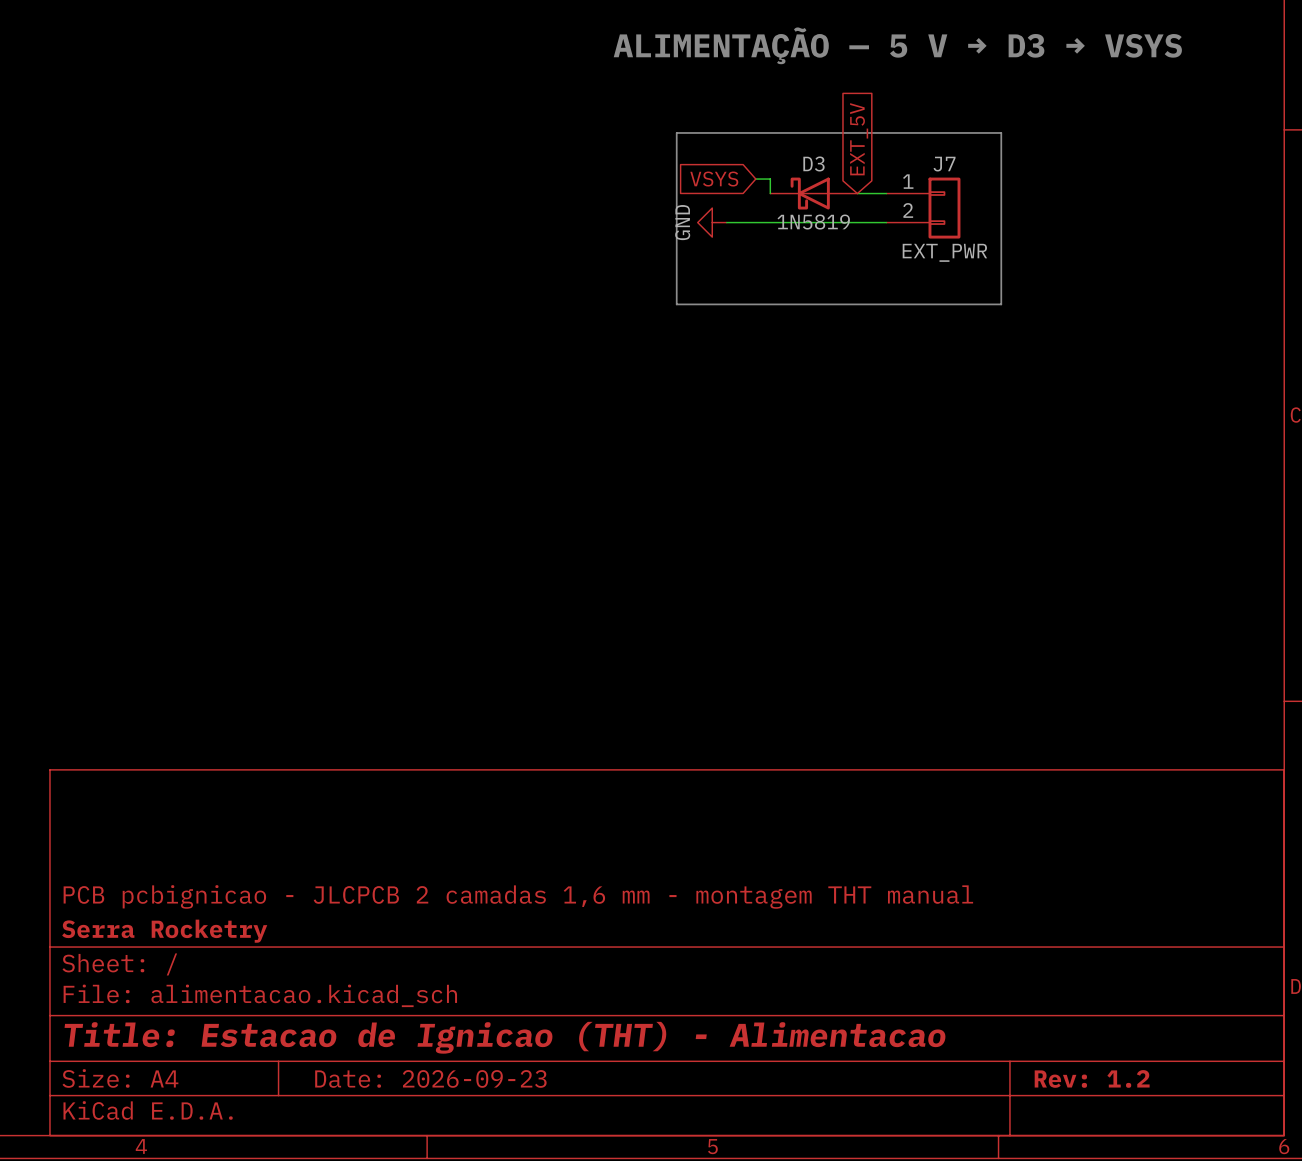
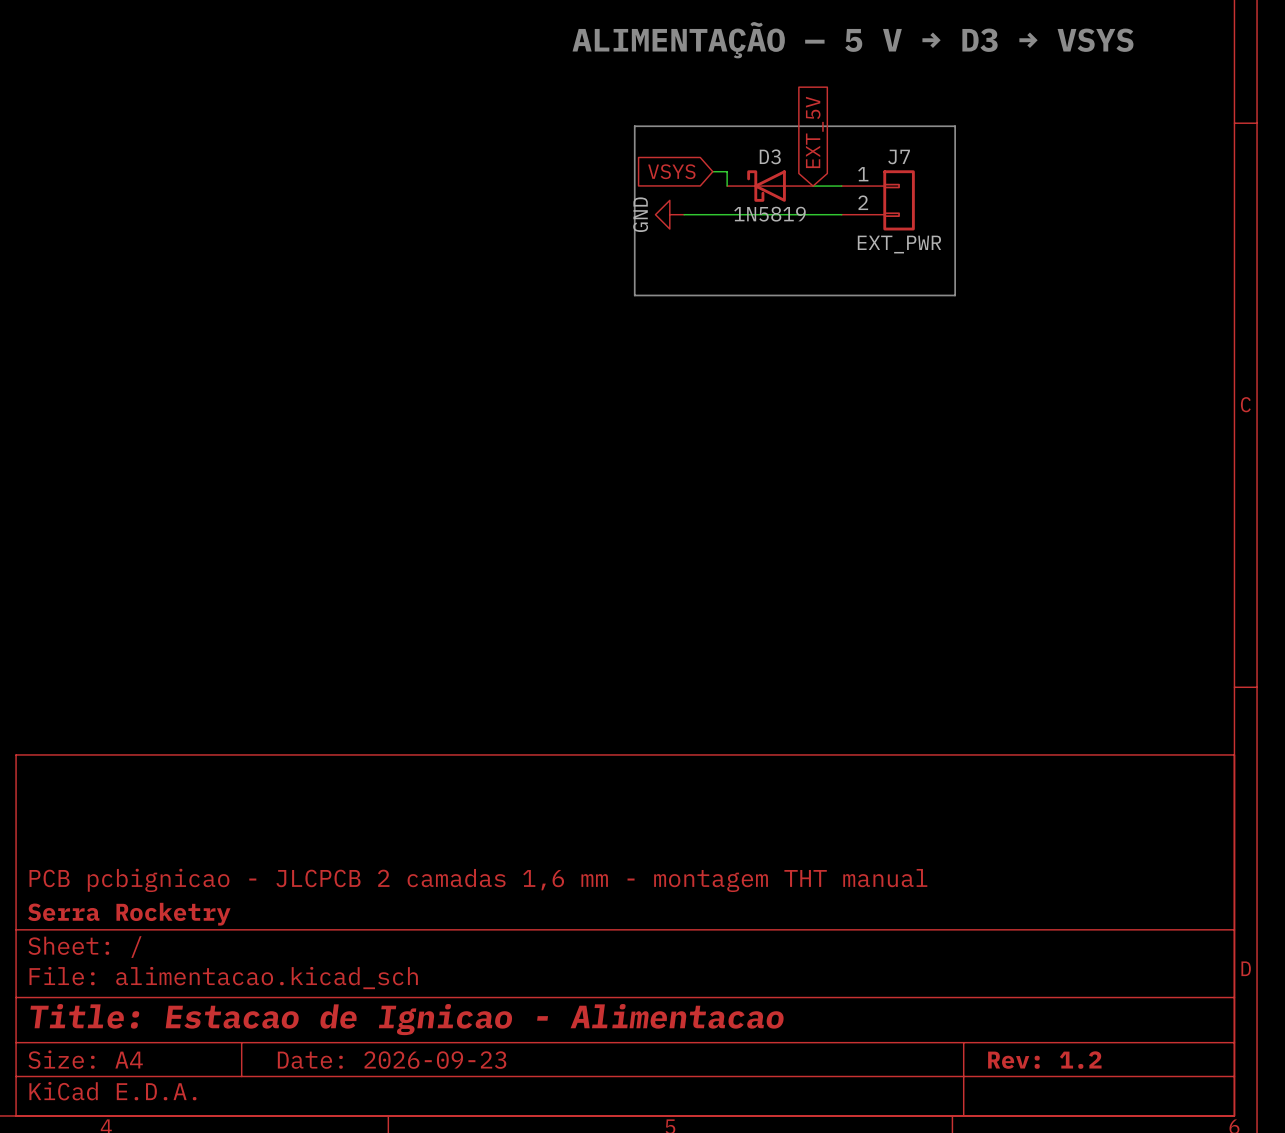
title block: Title: Estacao de Ignicao (THT) - Alimentacao (505, 1037) -> Title: Estacao de Ignicao - Alimentacao (407, 1019)

